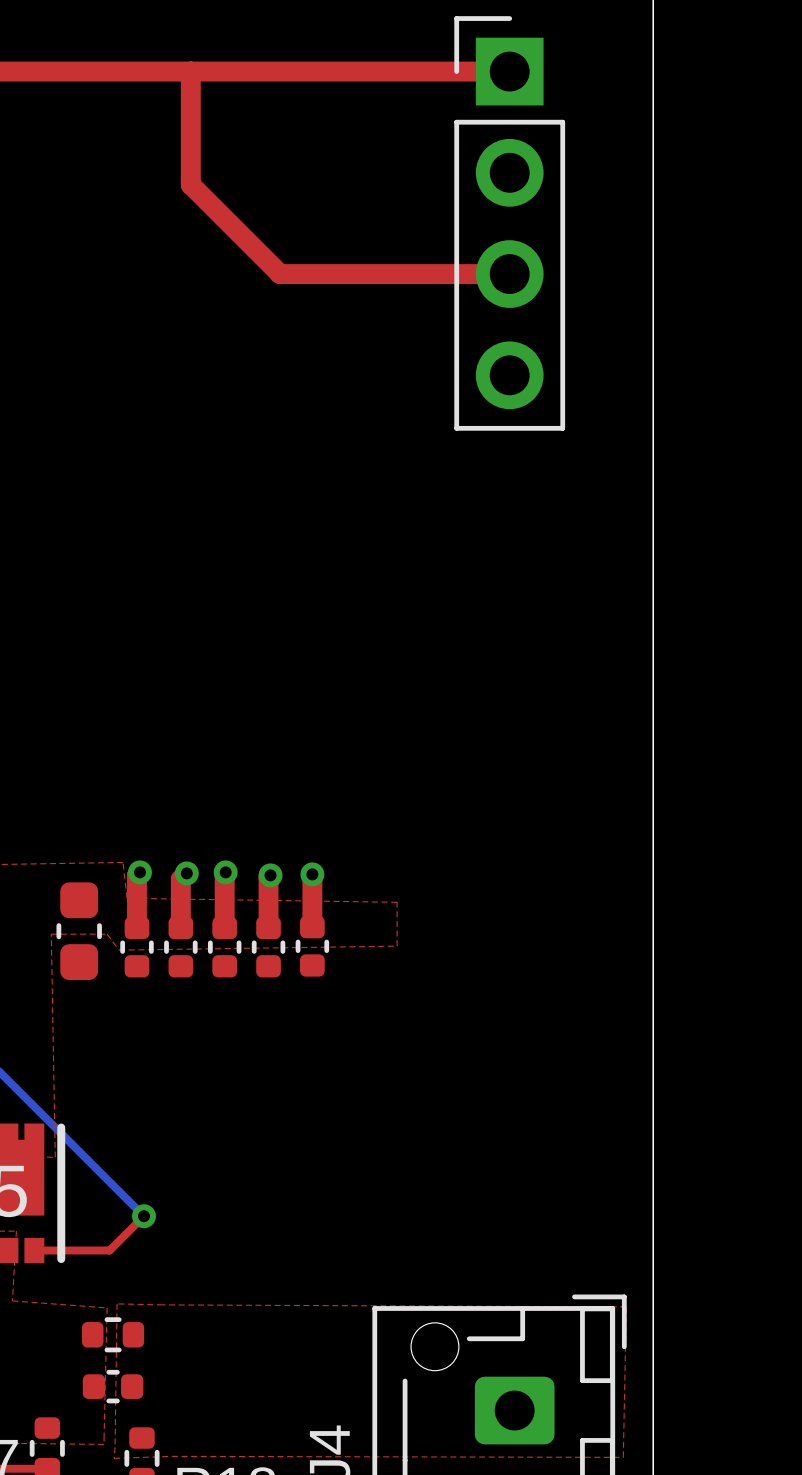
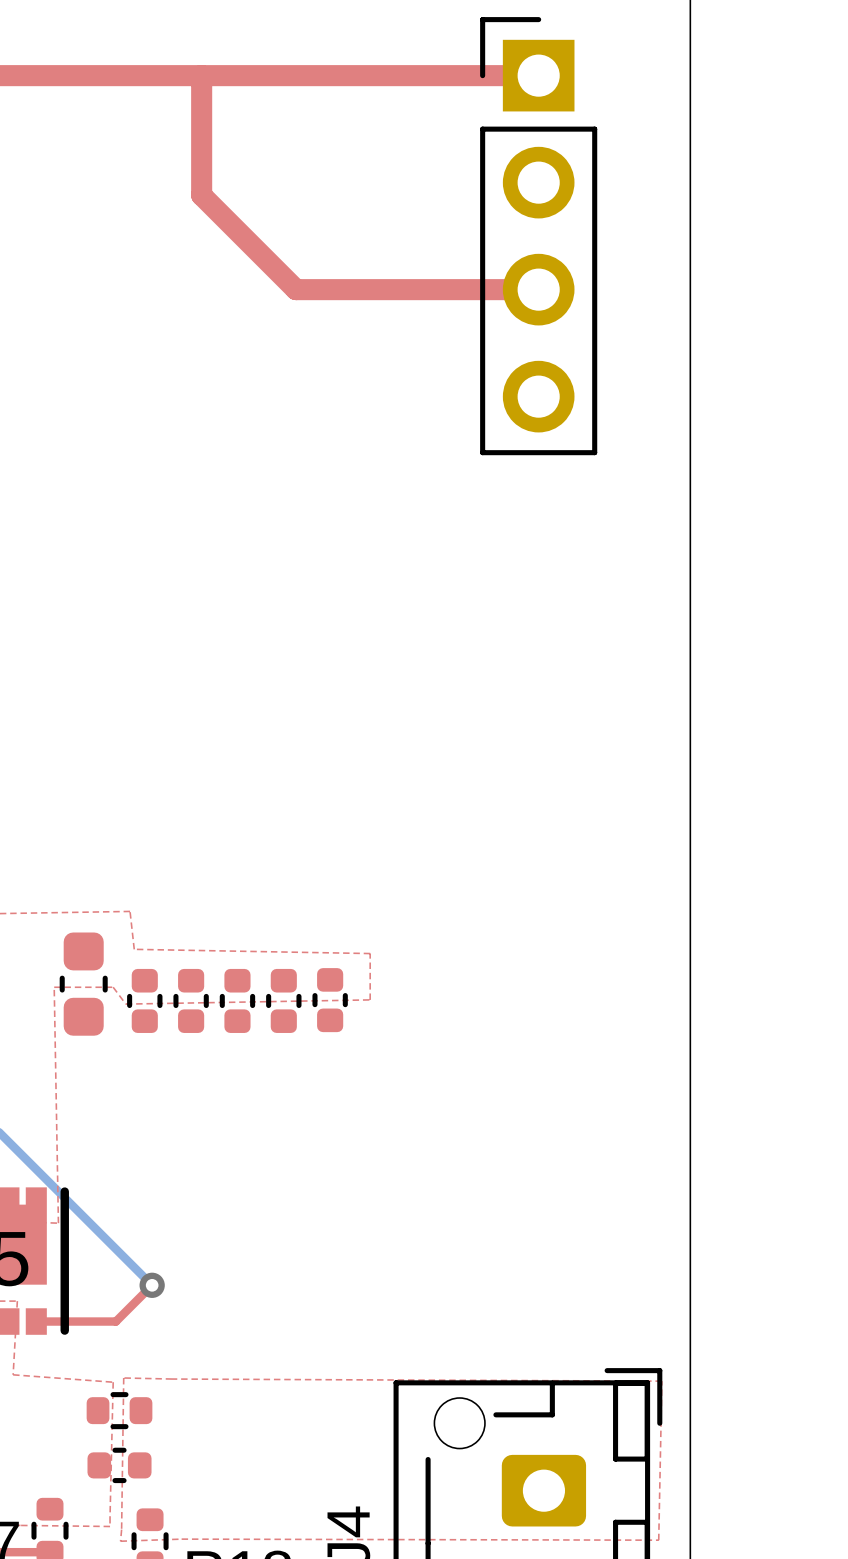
top track: (139, 872) (137, 875) (137, 928) -> none
via: (139, 872) -> none
top track: (225, 872) (224, 928) -> none
via: (225, 872) -> none
top track: (186, 873) (180, 879) (180, 928) -> none
via: (186, 873) -> none
top track: (312, 874) (312, 927) -> none
via: (312, 874) -> none
top track: (270, 875) (268, 877) (268, 928) -> none
via: (270, 875) -> none
top zone outline: (127, 898) (397, 902) (397, 946) (119, 950) -> (134, 949) (370, 953) (370, 999) (125, 1004)

